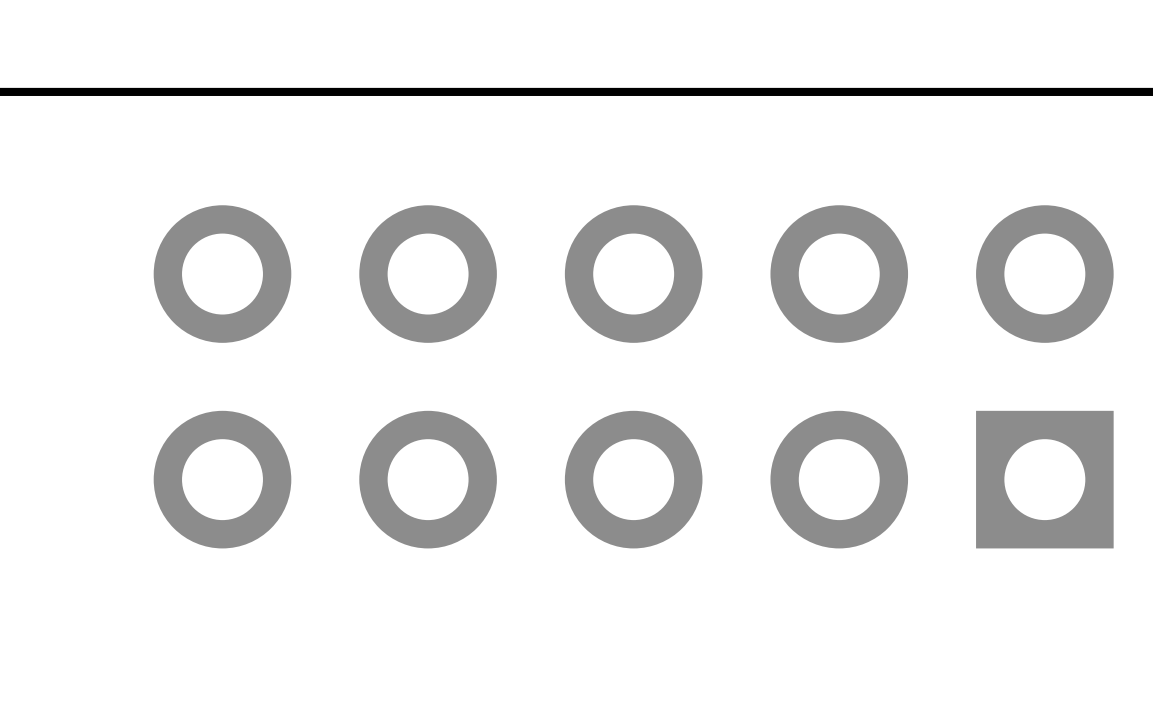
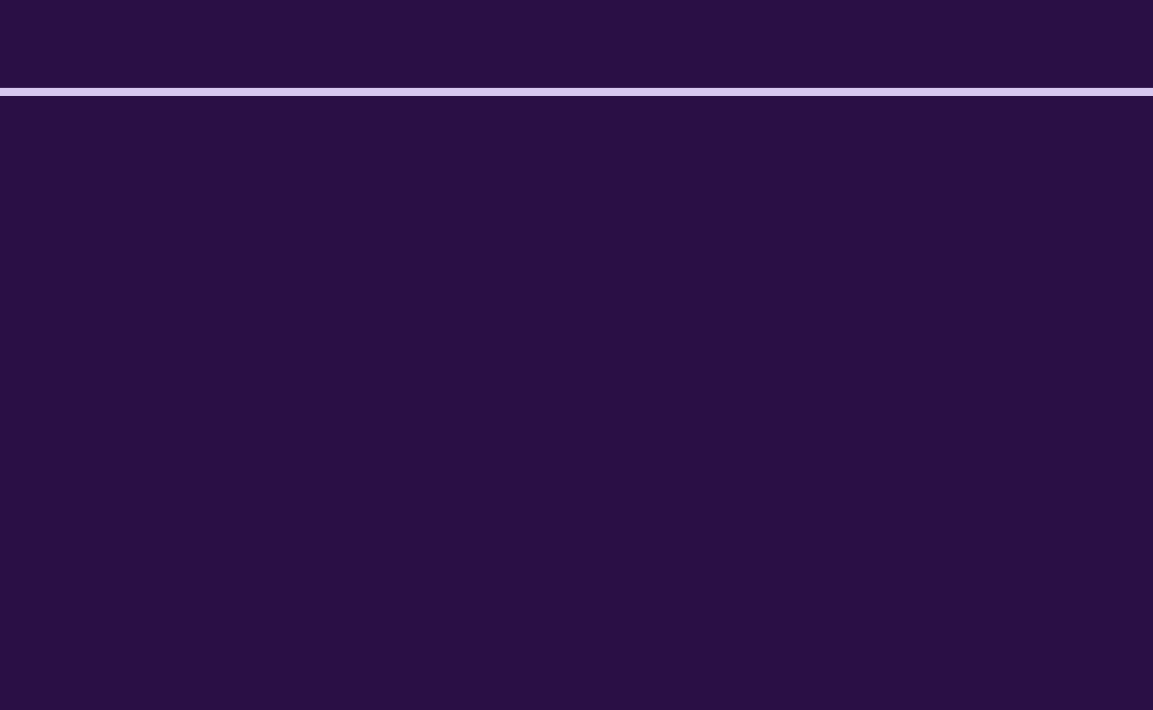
part: (633, 376) -> none

